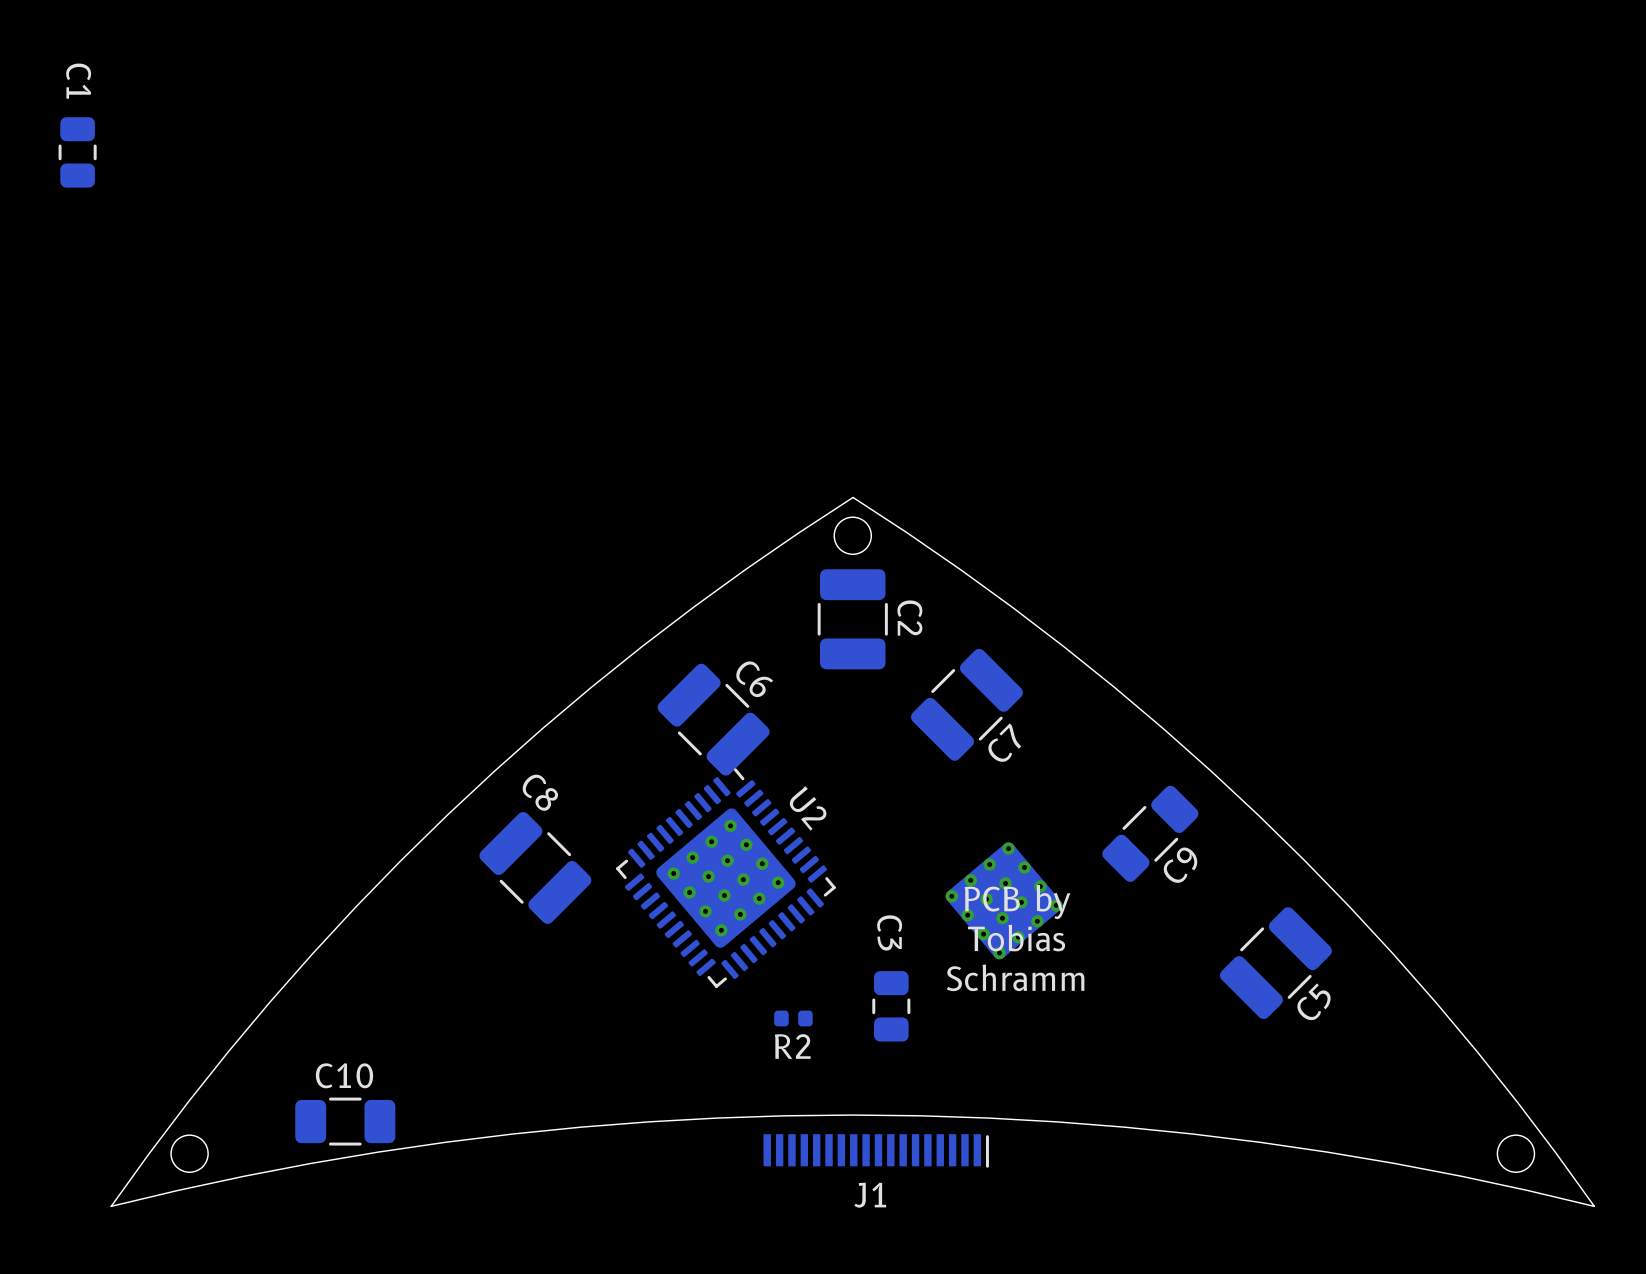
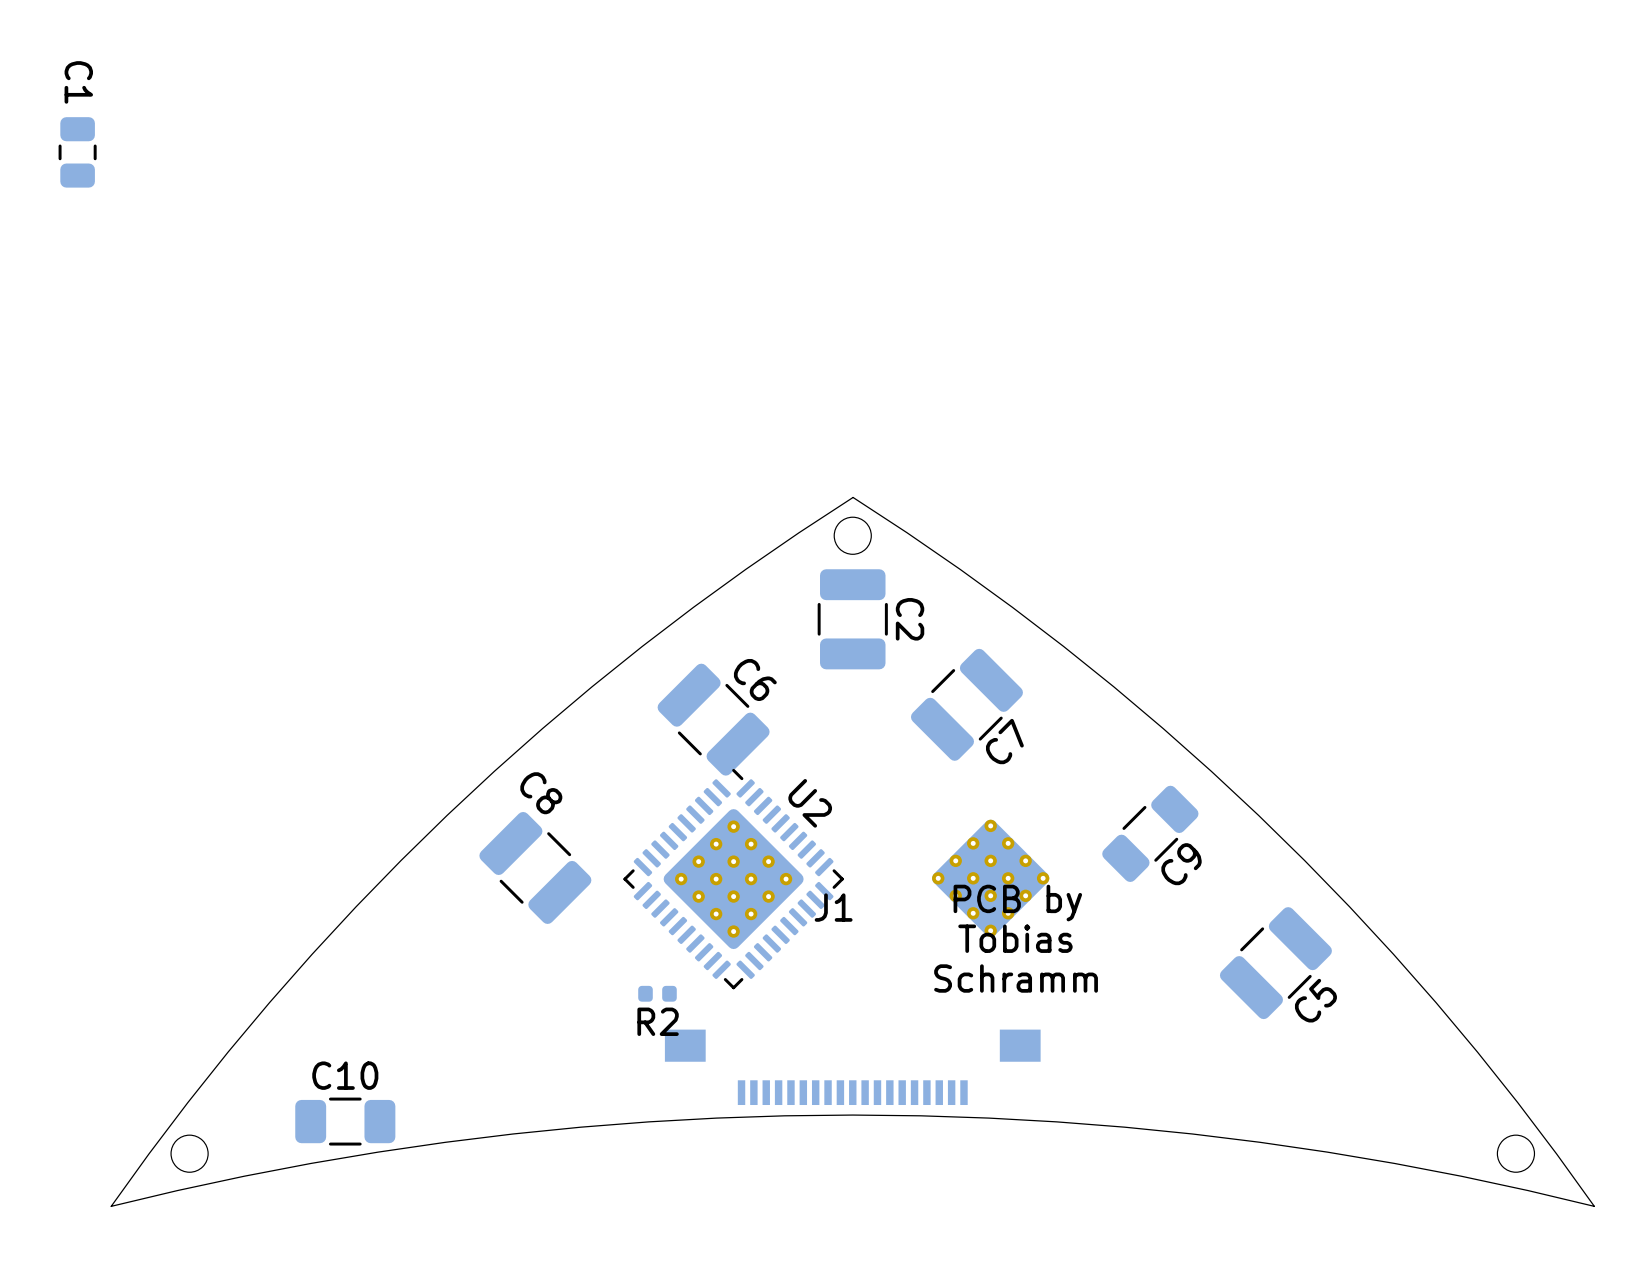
U2 rotation: 0° (725, 878) -> 5° counterclockwise (733, 879)
part: none -> (990, 878)
part: (1004, 900) -> none
C3: (891, 1006) -> none
R2 position: (793, 1018) -> (657, 993)
J1 footprint: [763, 1134, 989, 1168] -> [664, 1029, 1041, 1106]
J1 name position: J1 (870, 1195) -> J1 (833, 907)

